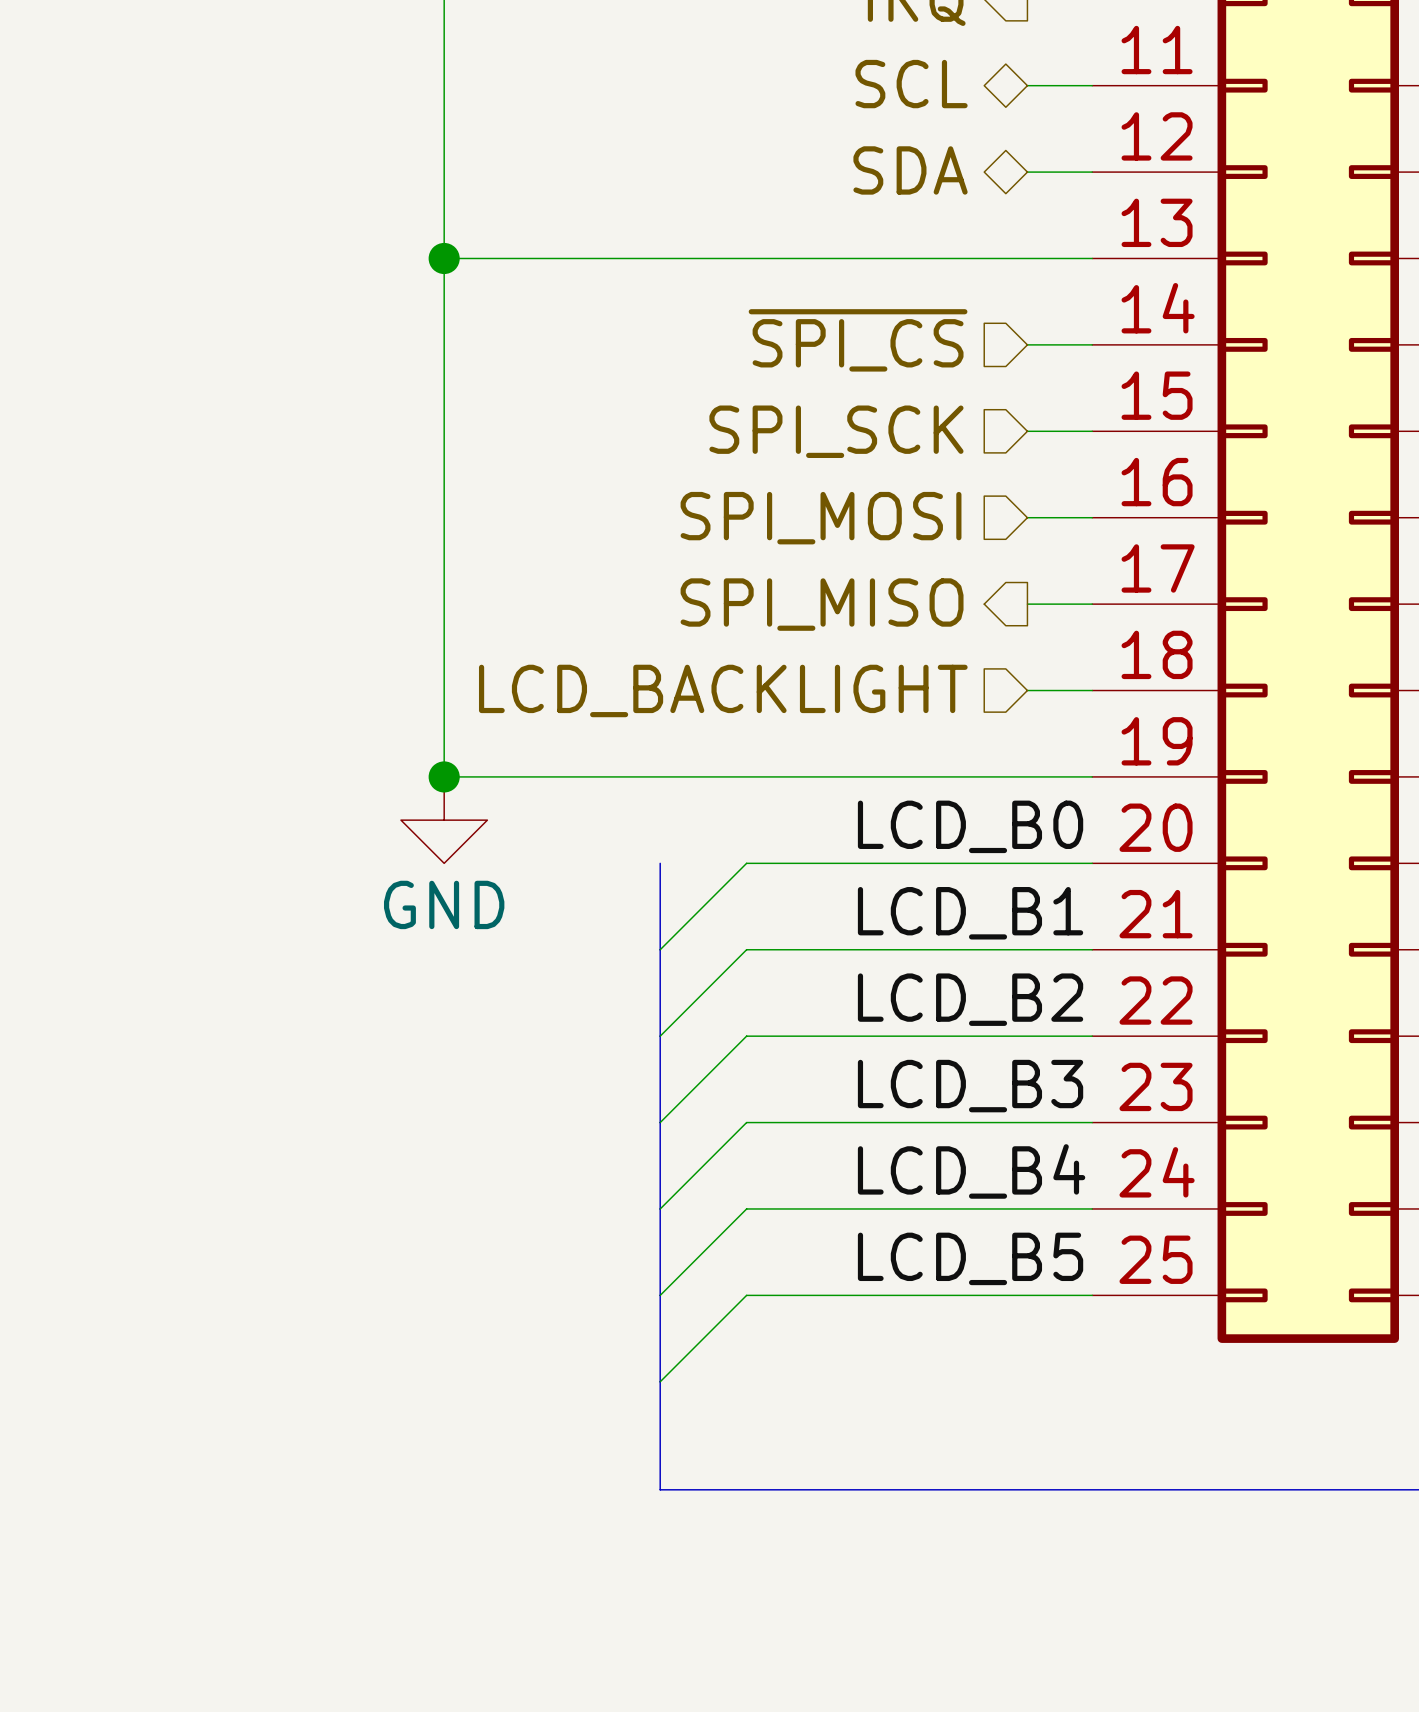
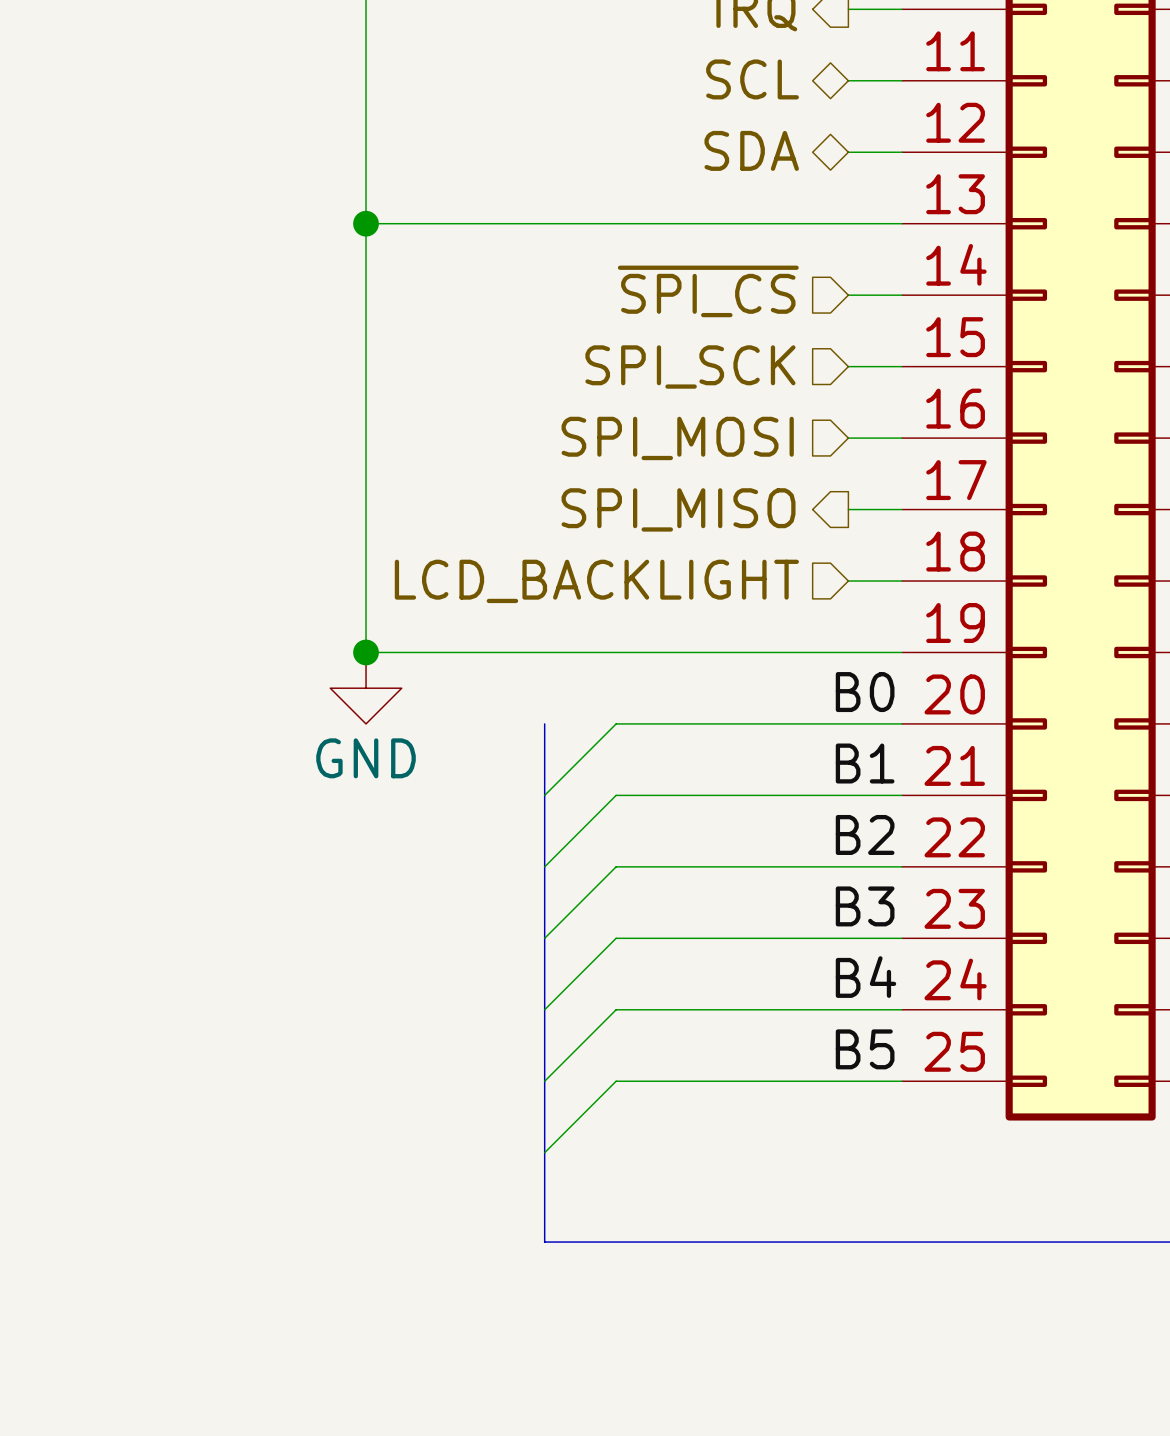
label: LCD_B0 (970, 826) -> B0 (865, 692)
label: LCD_B1 (970, 913) -> B1 (865, 763)
label: LCD_B2 (970, 999) -> B2 (865, 834)
label: LCD_B3 (970, 1086) -> B3 (865, 906)
label: LCD_B4 (971, 1171) -> B4 (865, 977)
label: LCD_B5 (970, 1258) -> B5 (865, 1049)

